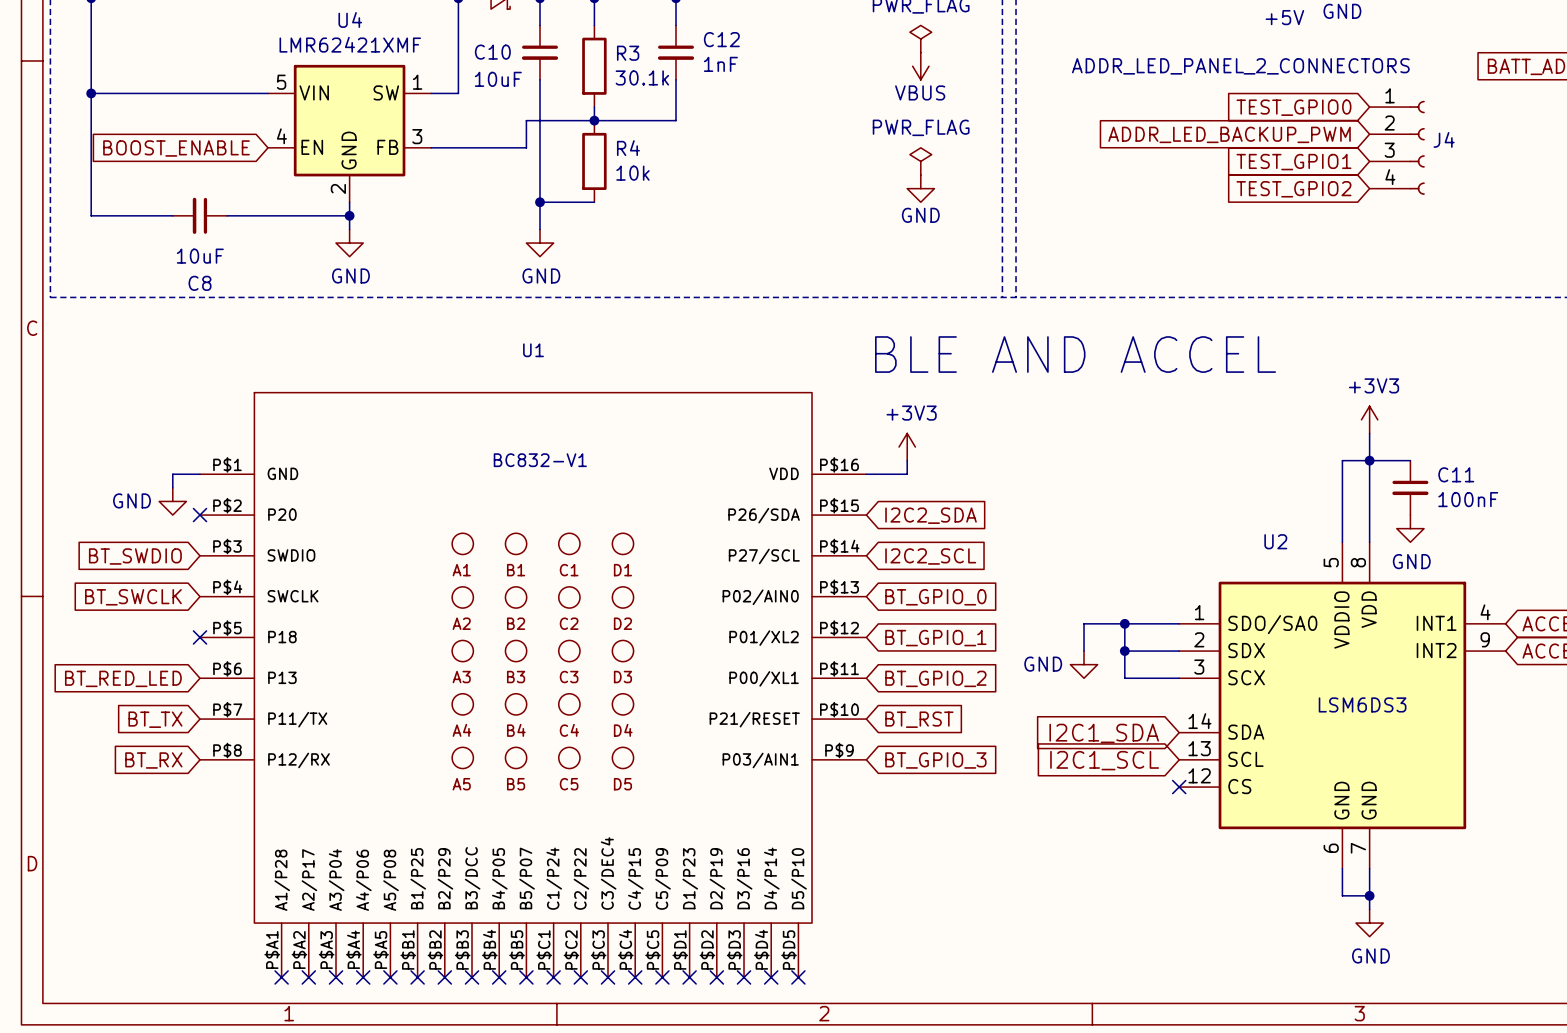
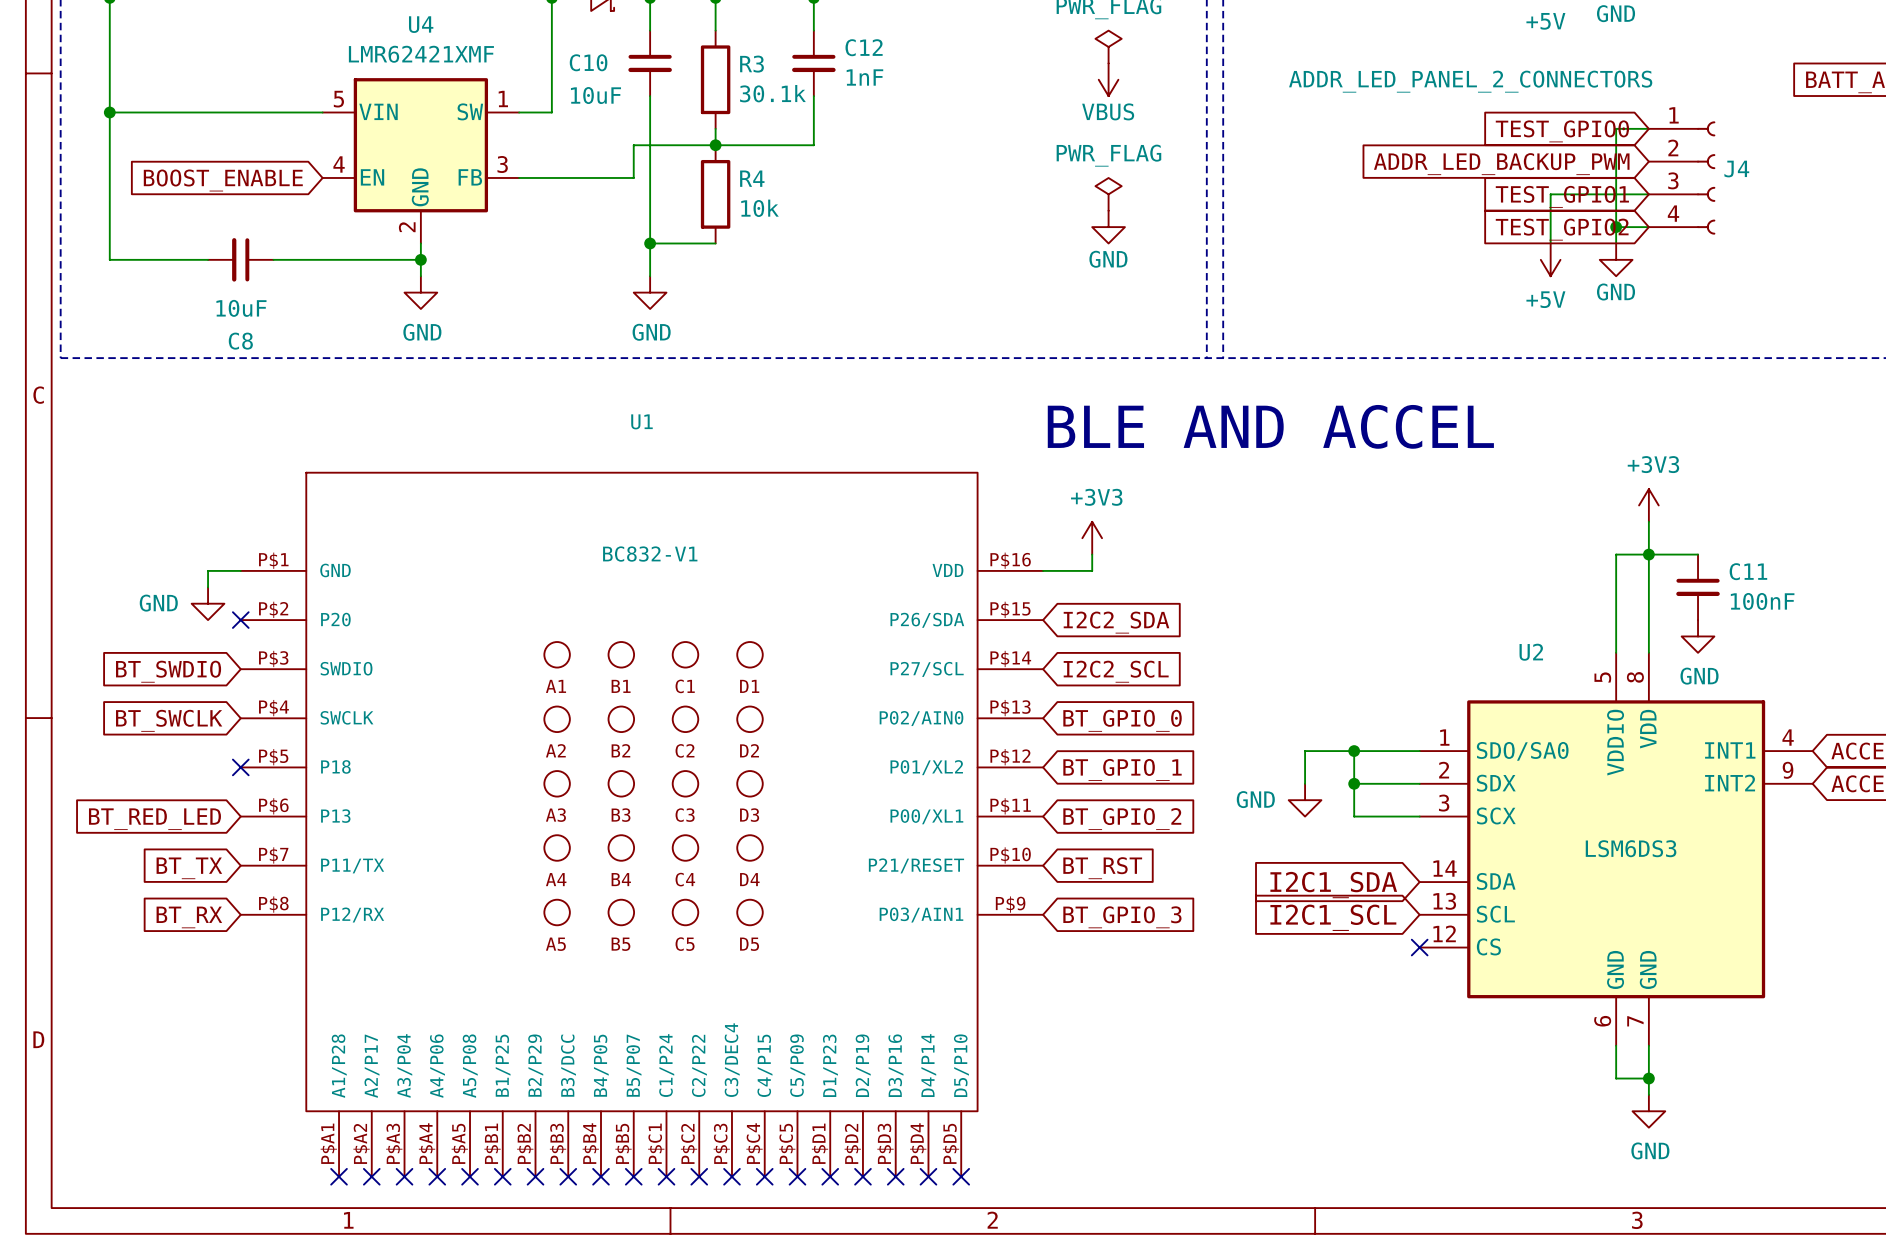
wire: none -> (1648, 128) (1616, 128) (1616, 243)
wire: none -> (1648, 194) (1550, 194) (1550, 243)
wire: none -> (1616, 227) (1648, 227)
junction: none -> (1616, 227)
power symbol: none -> +5V (1550, 259)
power symbol: none -> GND (1616, 259)

